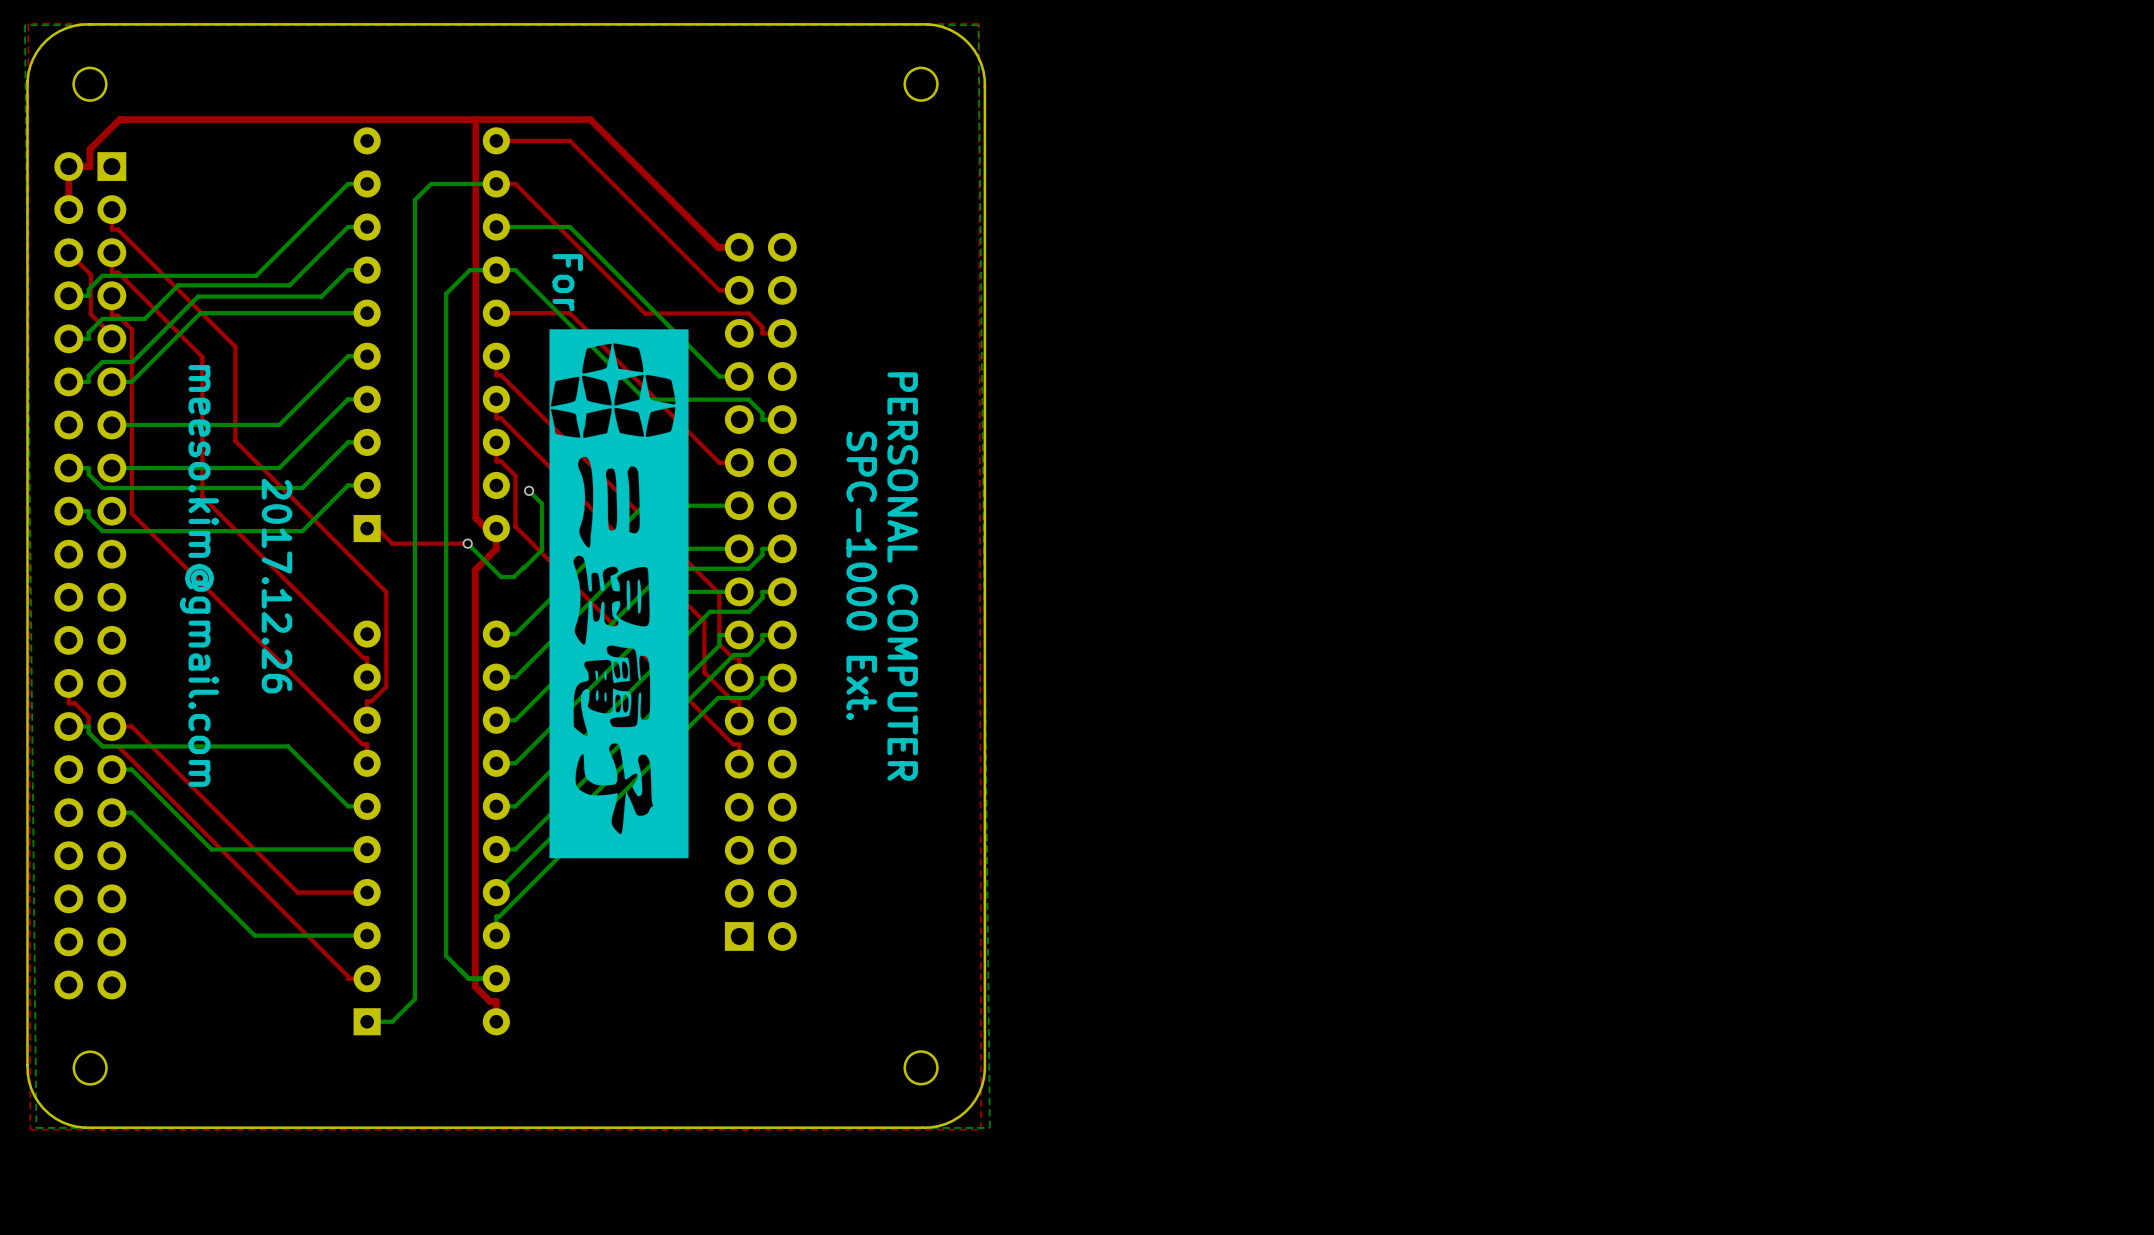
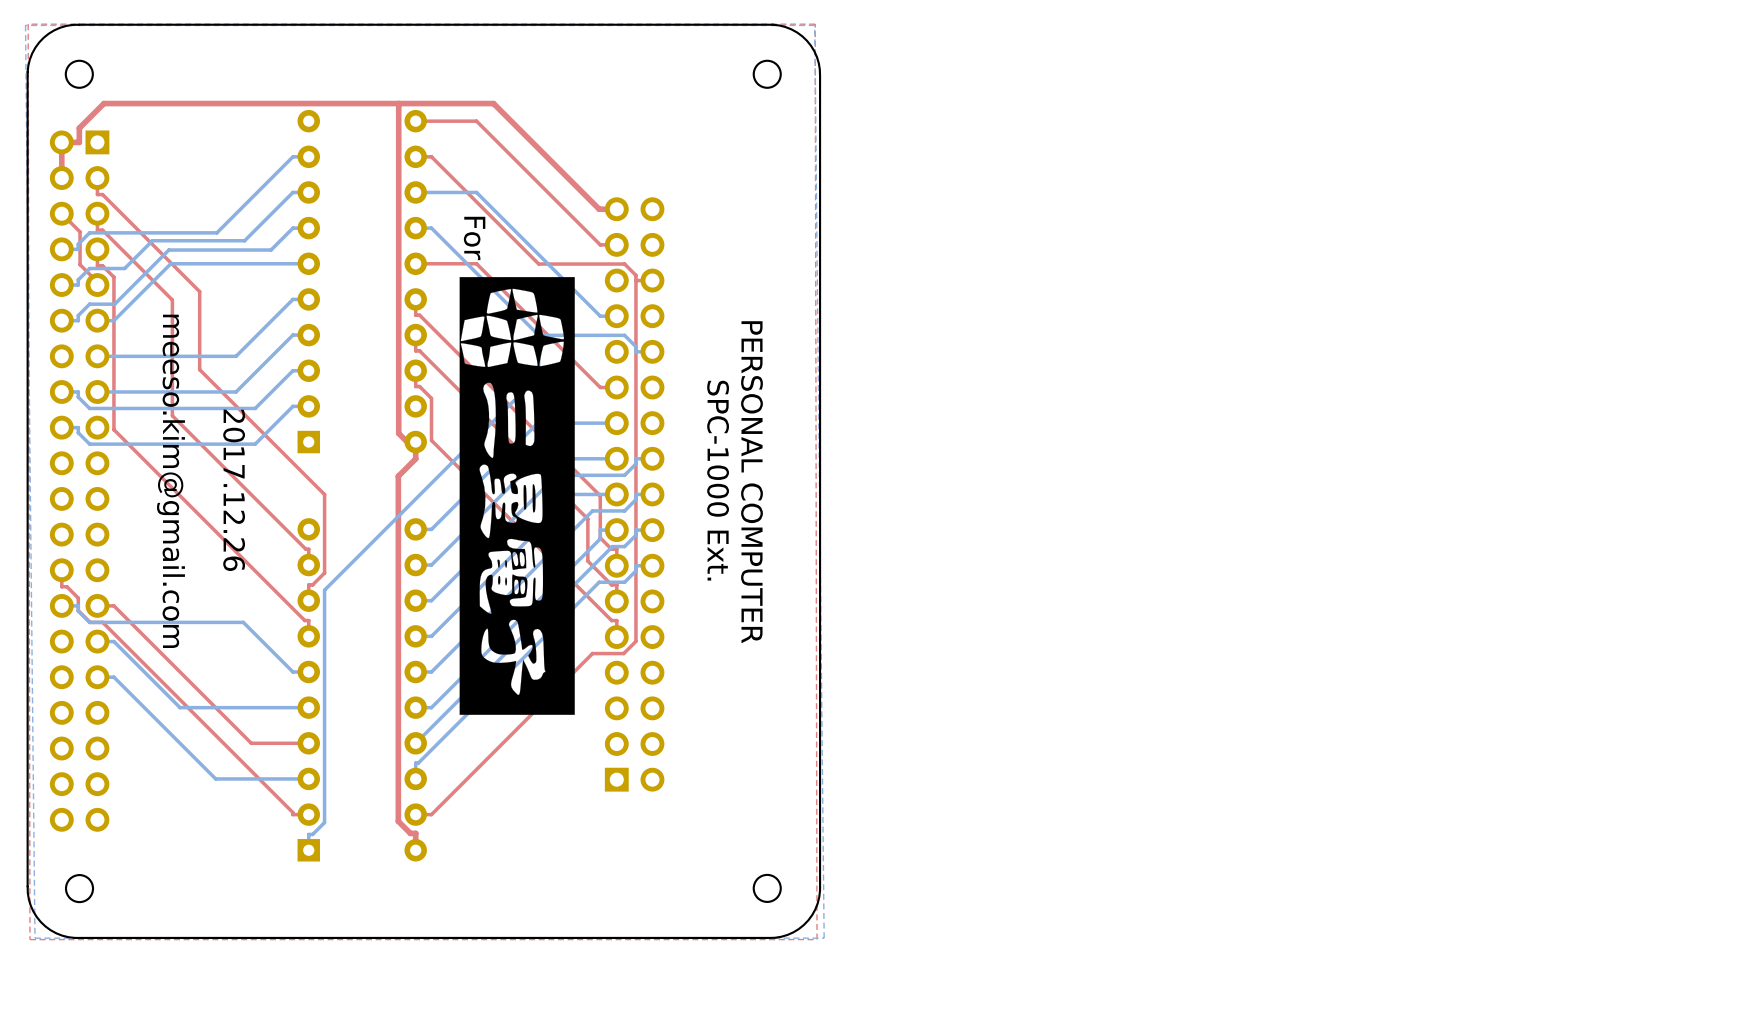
bottom track: (496, 183) (431, 183) (414, 200) (414, 999) (392, 1021) (367, 1021) -> (538, 335) (538, 376) (324, 590) (324, 822) (312, 834) (308, 834) (308, 850)
bottom track: (496, 270) (469, 270) (446, 293) (446, 956) (468, 978) (496, 978) -> none
top track: none -> (635, 280) (635, 641) (623, 653) (592, 653) (431, 814) (415, 814)
bottom track: (529, 490) (542, 503) (542, 550) (523, 568) -> none
via: (529, 490) -> none
top track: (367, 528) (377, 528) (392, 543) (467, 543) -> none
bottom track: (467, 543) (501, 577) (514, 577) (524, 567) -> none
via: (467, 543) -> none

